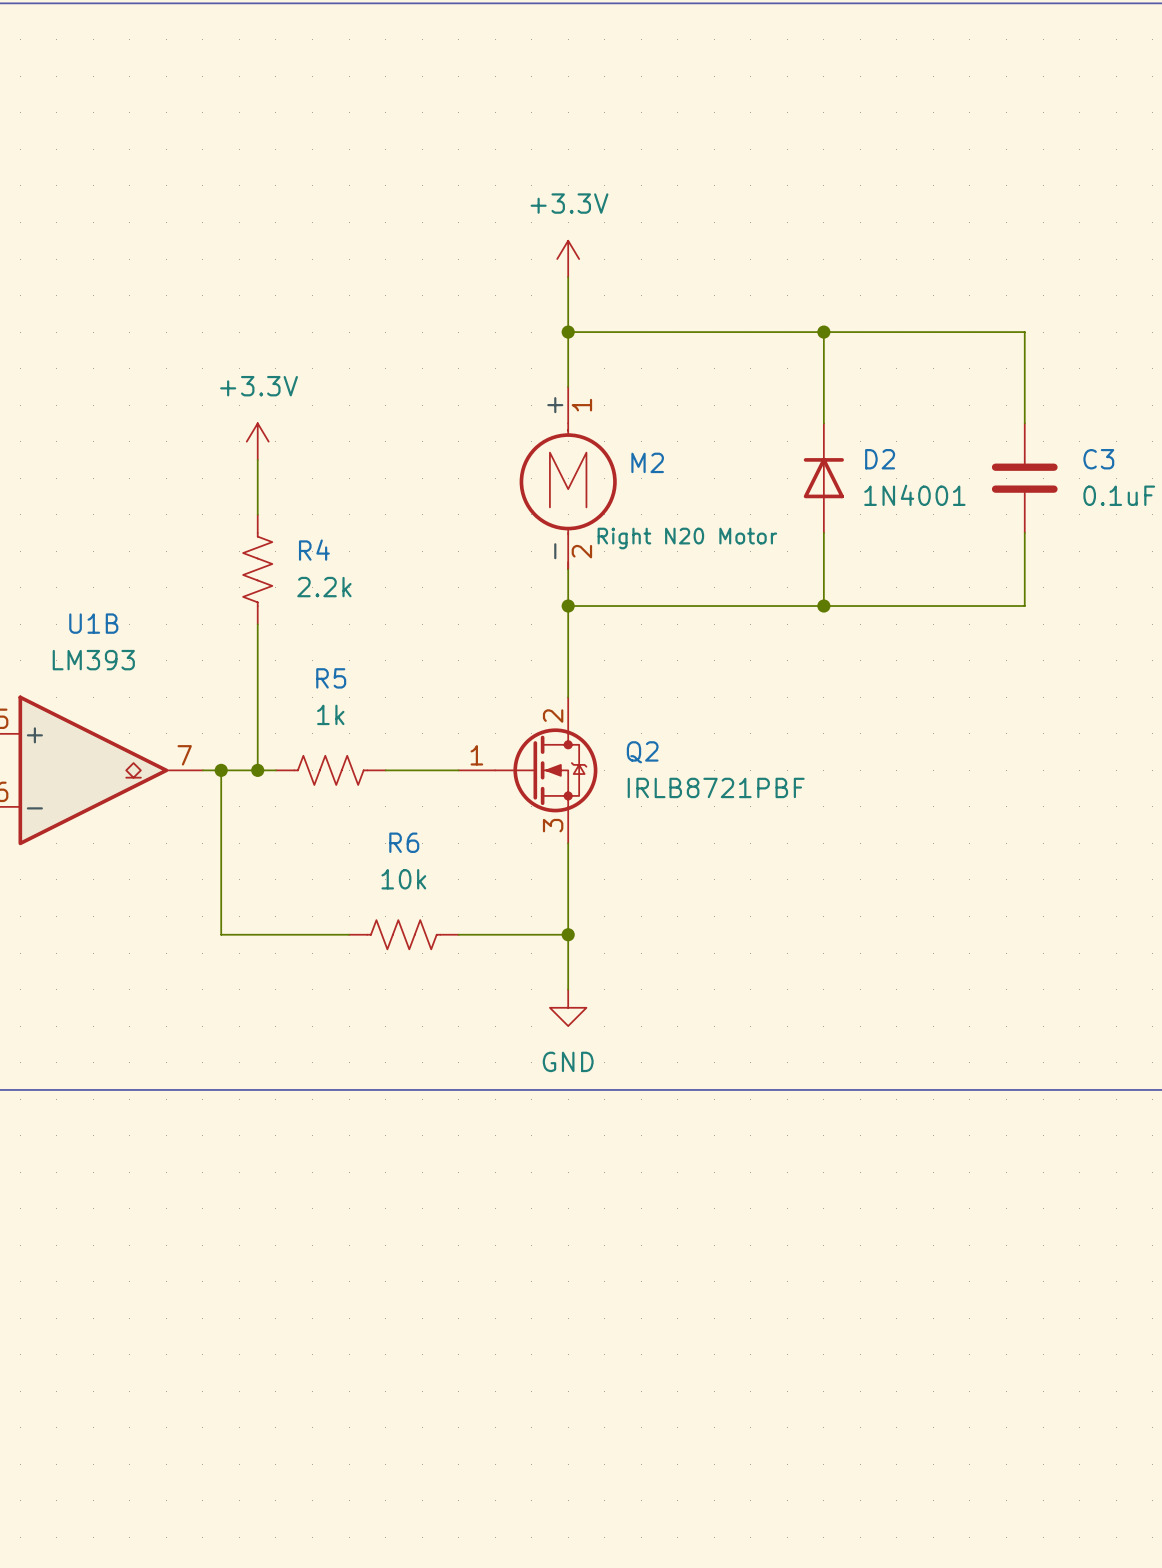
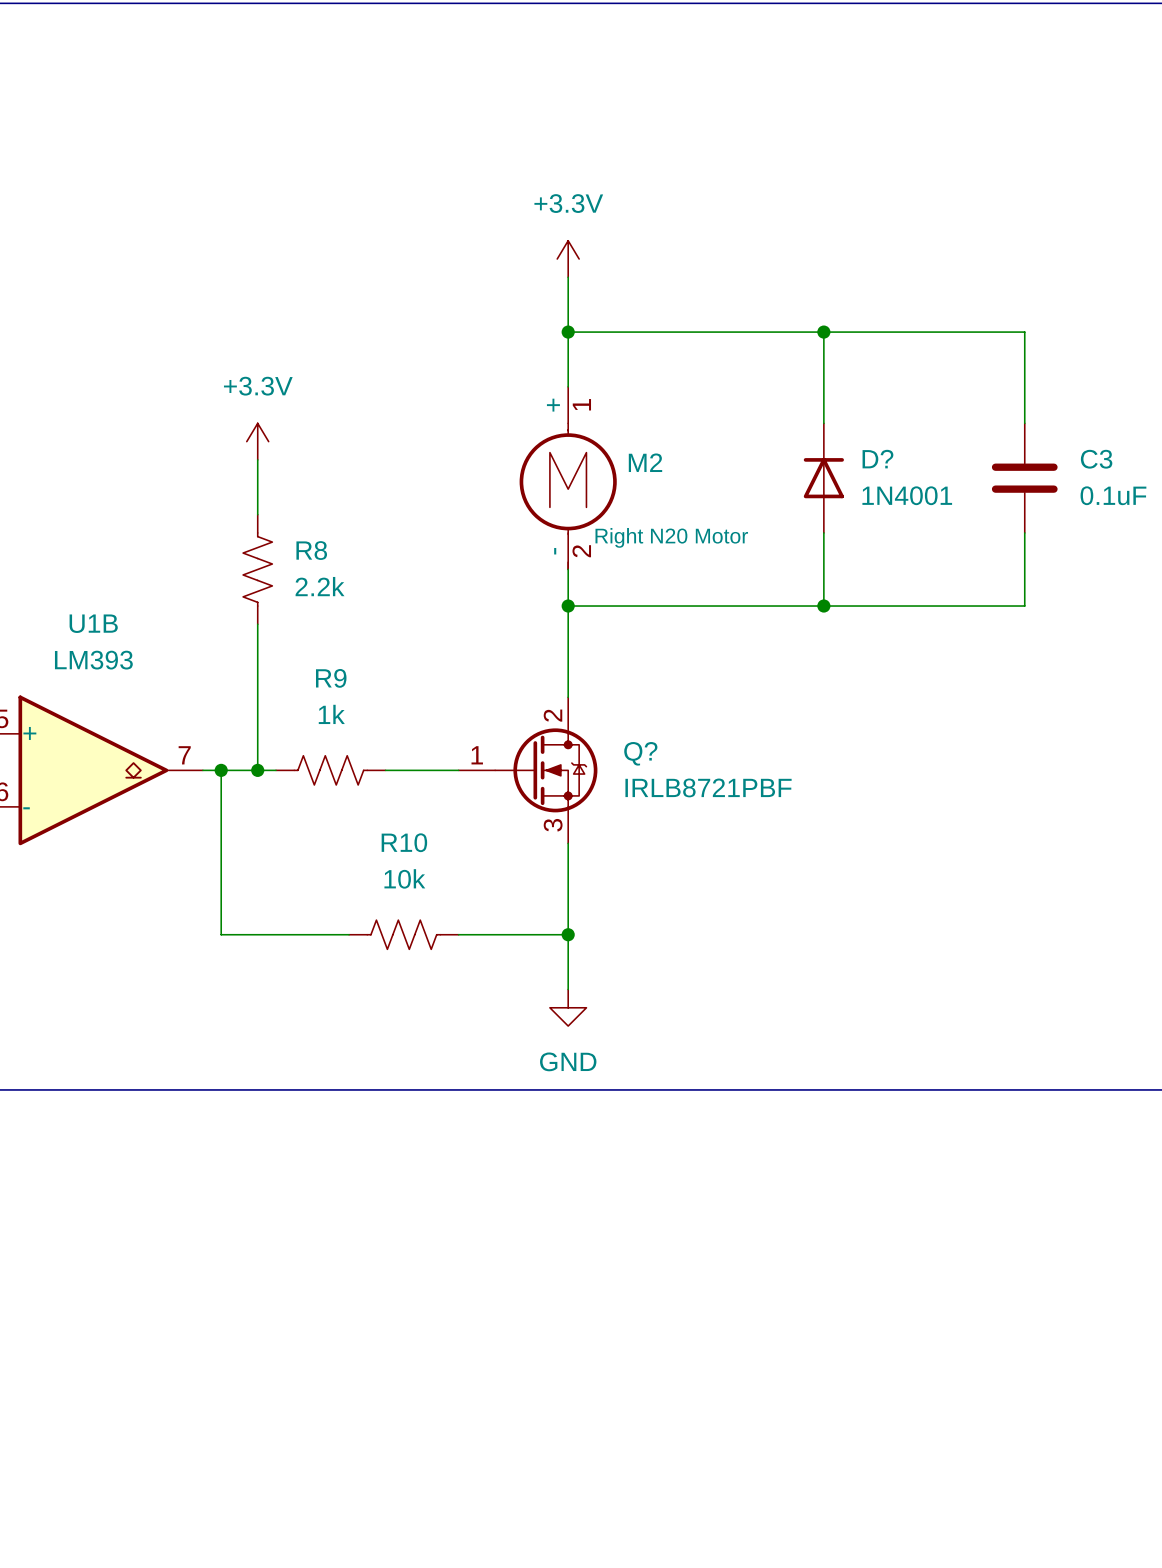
D2 name: D2 (880, 459) -> D? (877, 459)
R4 name: R4 (314, 550) -> R8 (311, 550)
R5 name: R5 (331, 678) -> R9 (331, 678)
Q2 name: Q2 (642, 752) -> Q? (640, 753)
R6 name: R6 (404, 842) -> R10 (404, 842)

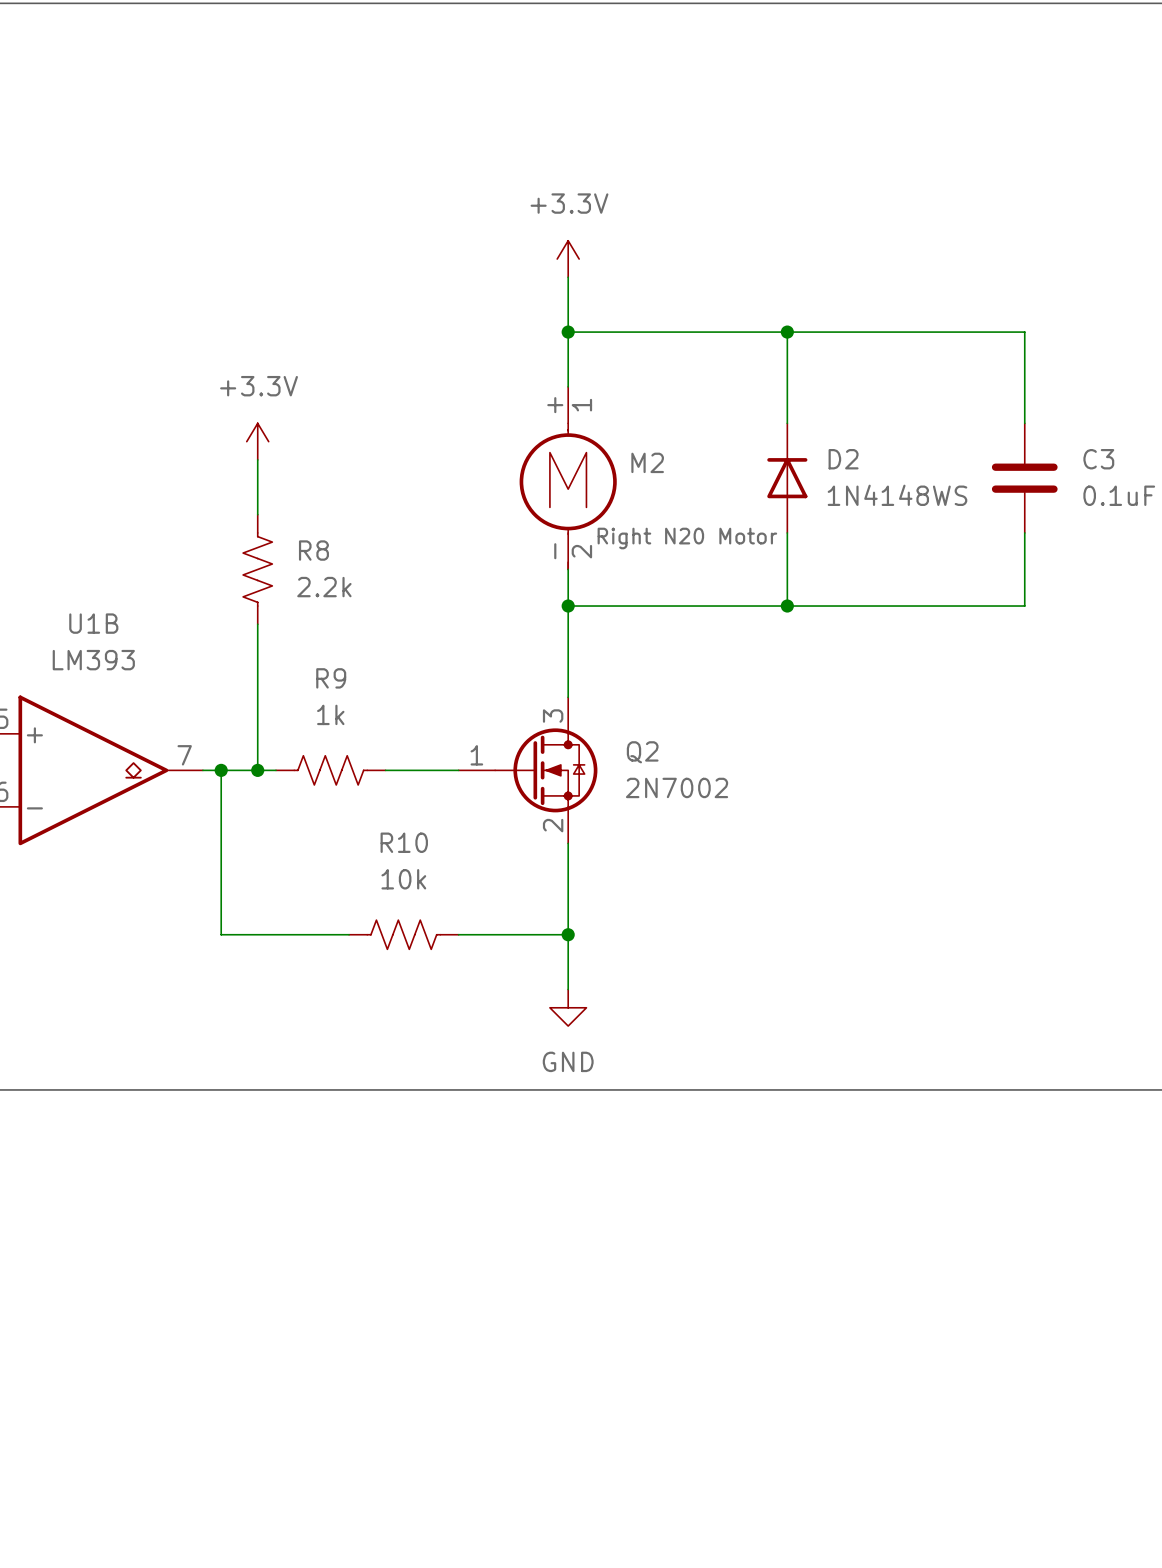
wire: (823, 332) (823, 423) -> (787, 332) (787, 423)
junction position: (823, 332) -> (787, 332)
D2: none -> 1N4148WS (787, 478)
D?: 1N4001 (823, 478) -> none
wire: (823, 532) (823, 606) -> (787, 532) (787, 606)
junction position: (823, 606) -> (787, 606)
Q?: IRLB8721PBF (528, 770) -> none
Q2: none -> 2N7002 (528, 770)

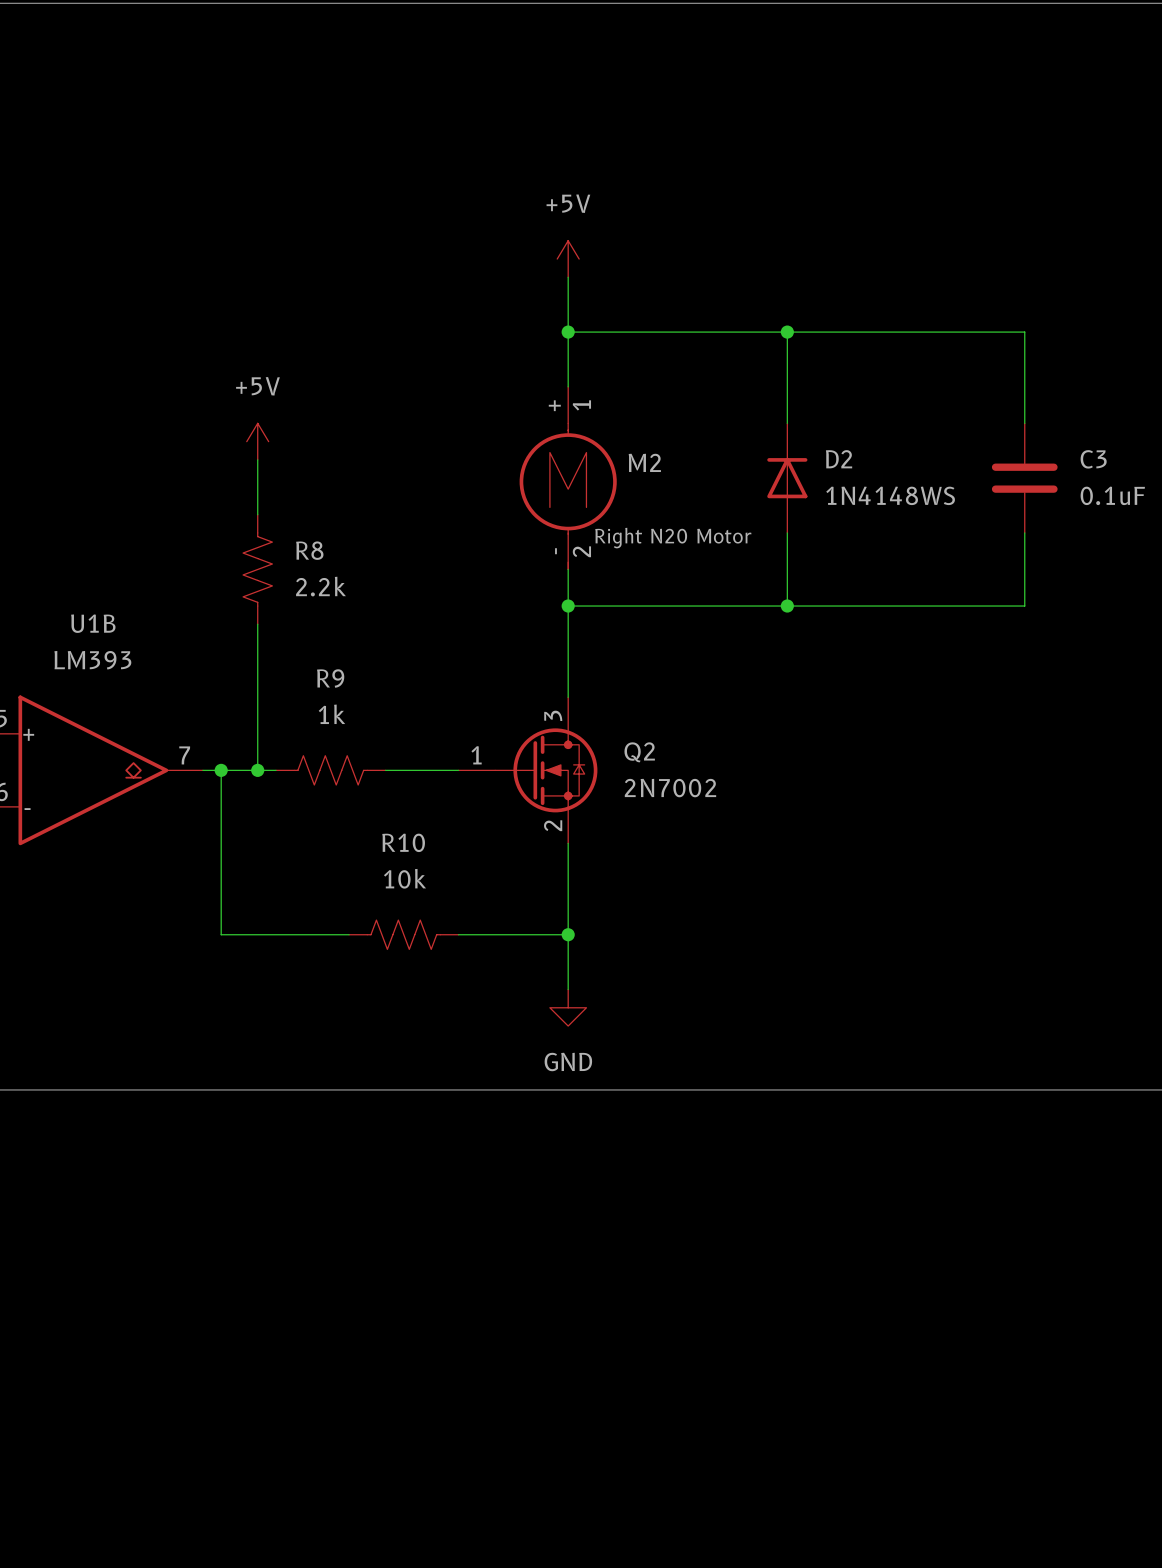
power symbol: +3.3V (568, 259) -> +5V (568, 259)
power symbol: +3.3V (257, 441) -> +5V (257, 441)

